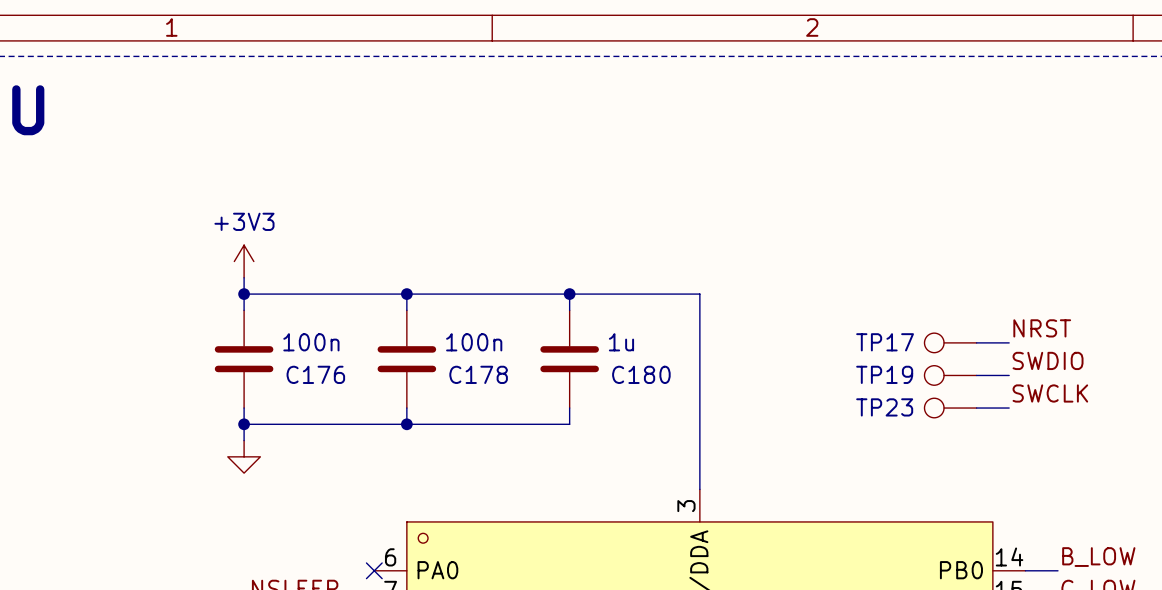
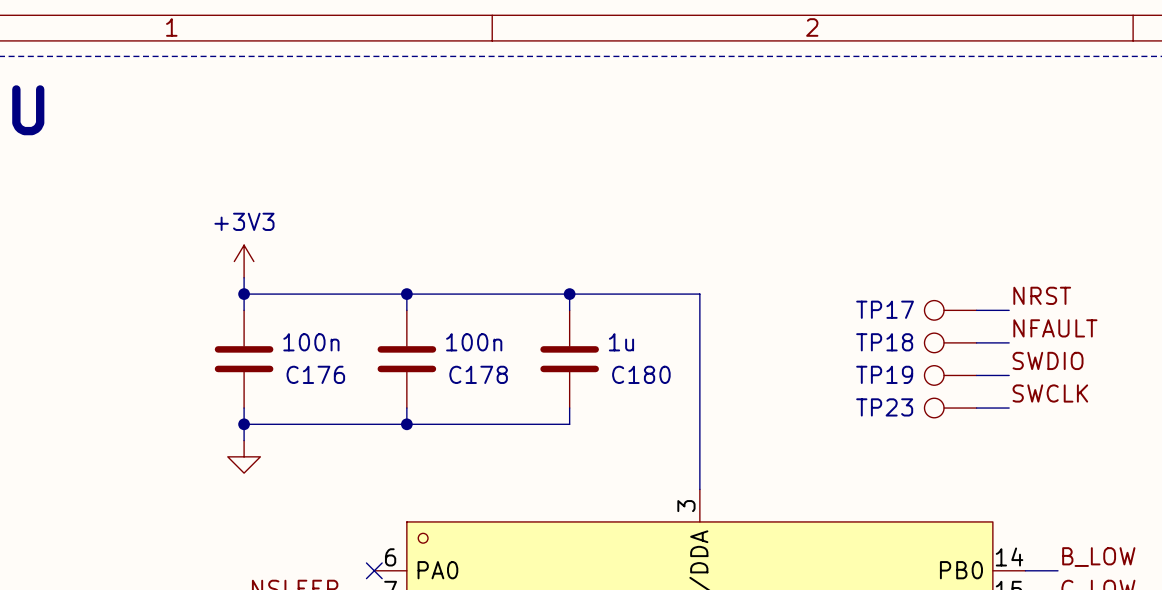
label: none -> NRST (1042, 295)
TP17: none -> (950, 310)
wire: none -> (976, 310) (1009, 310)
label: NRST (1042, 328) -> NFAULT (1055, 328)
TP17 name: TP17 (885, 342) -> TP18 (884, 342)

